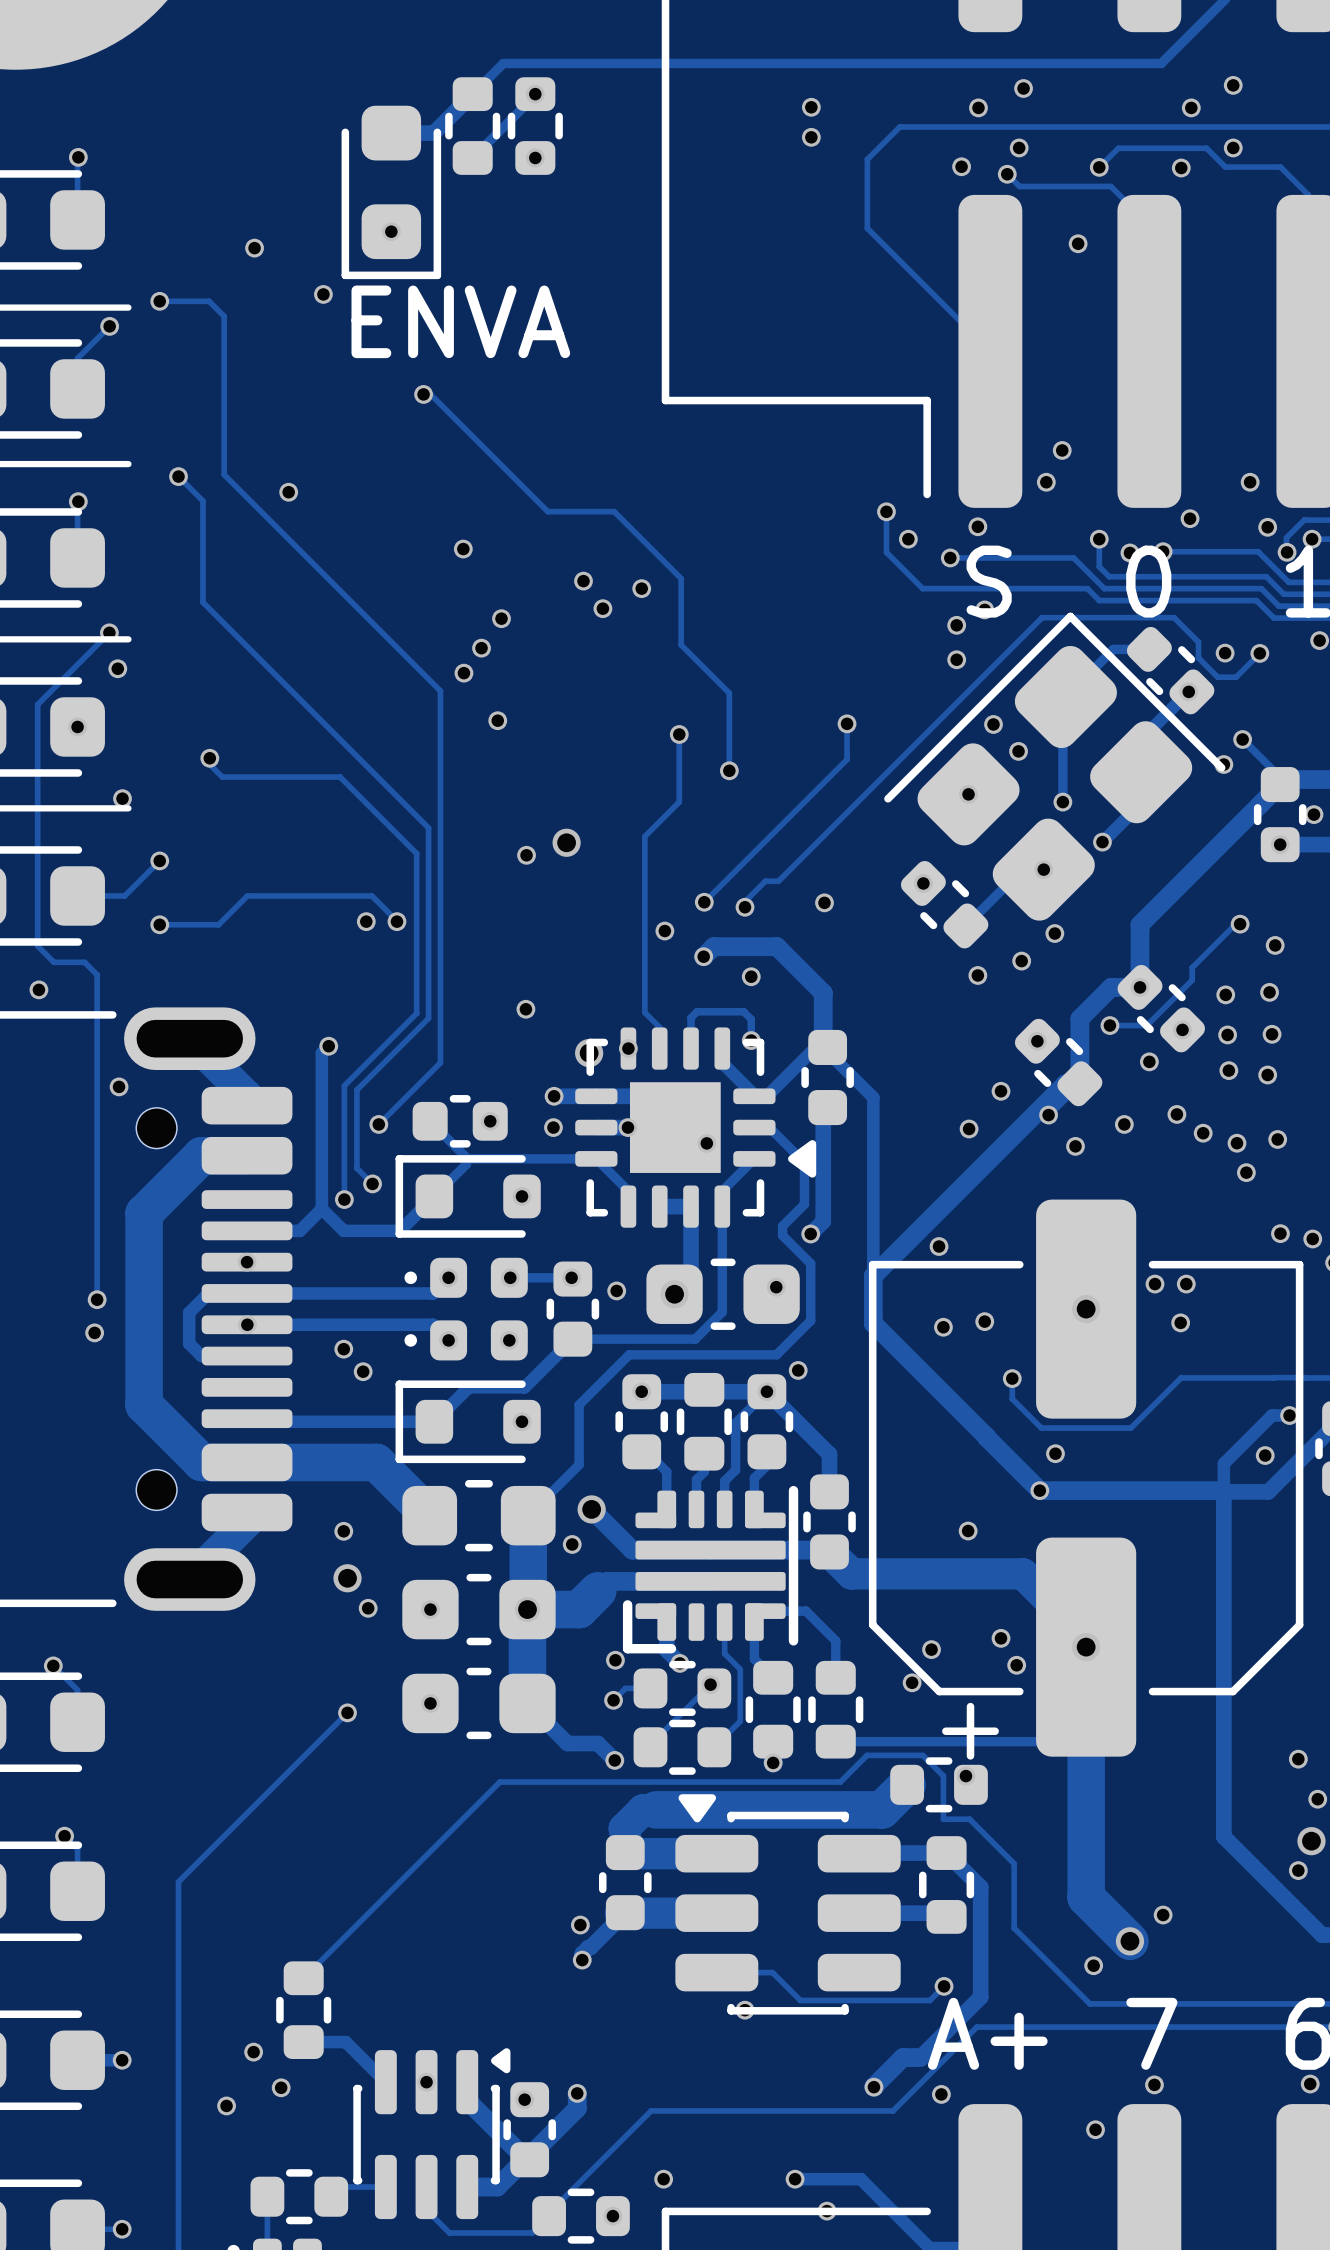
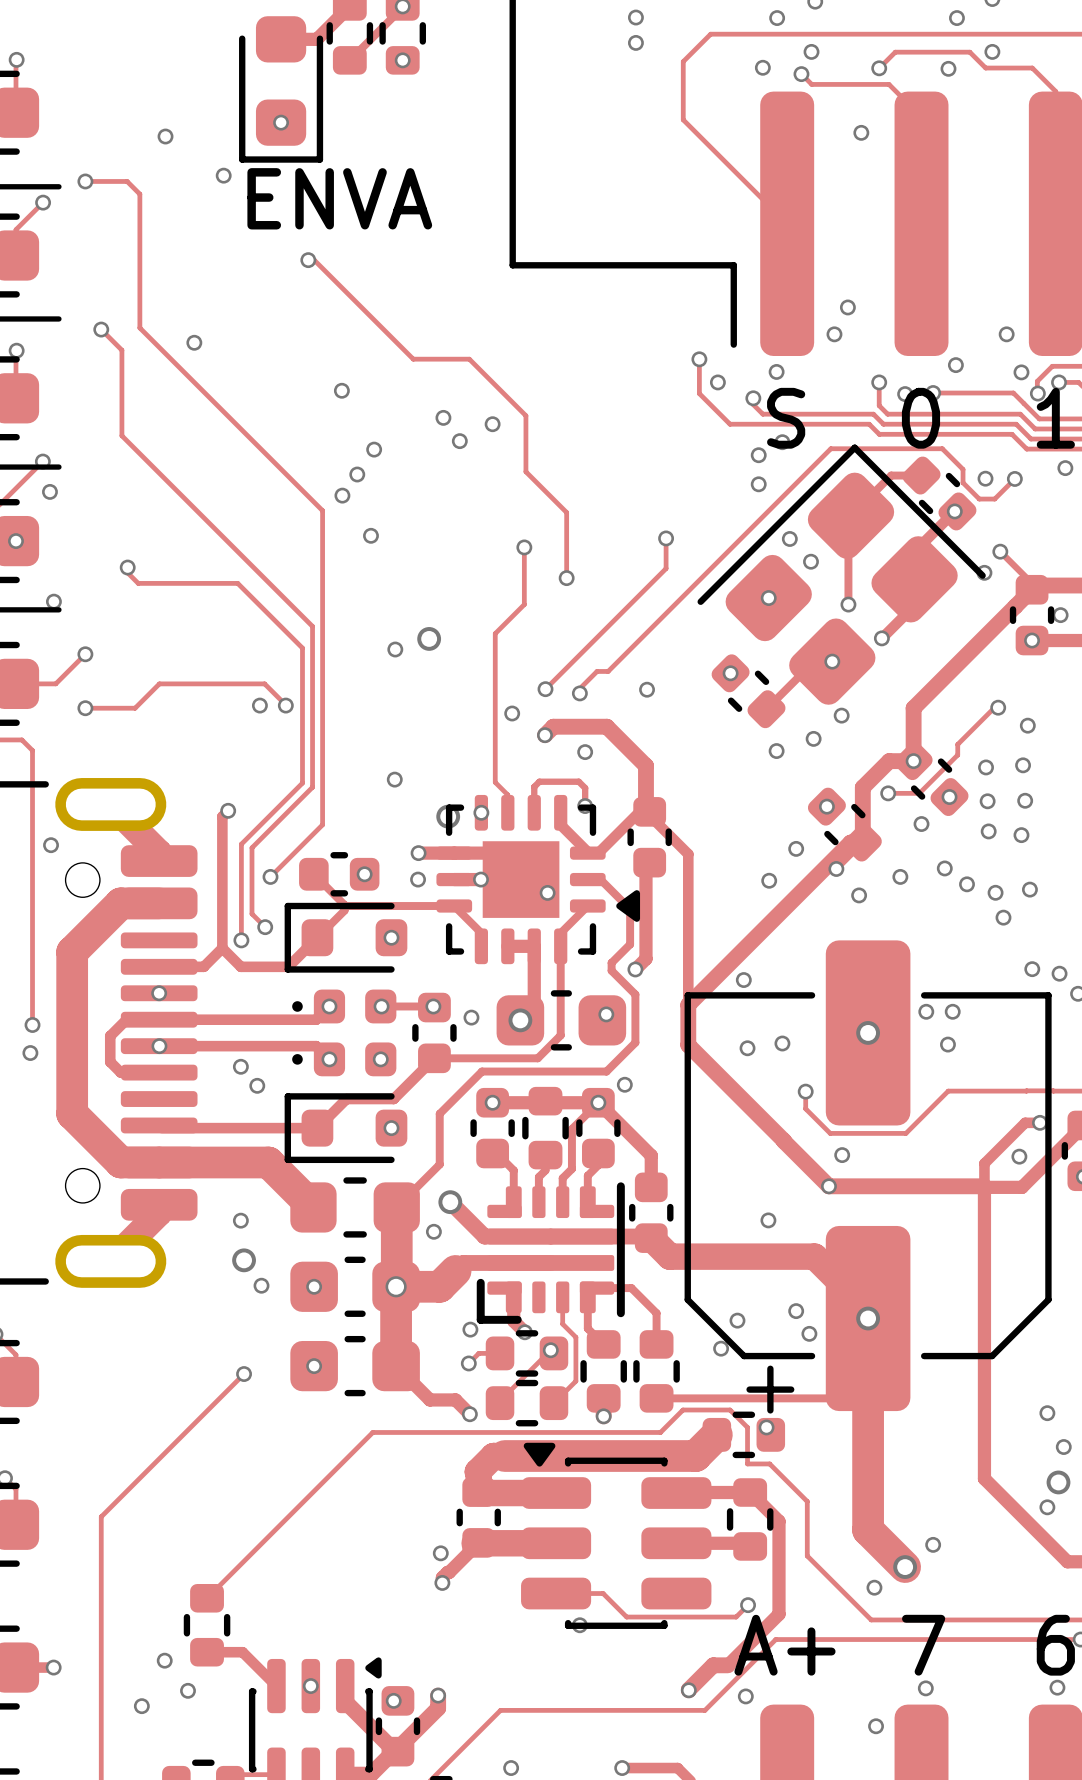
track: (950, 557) (1073, 557) (1092, 576) -> (753, 398) (753, 404) (762, 414) (873, 414)

